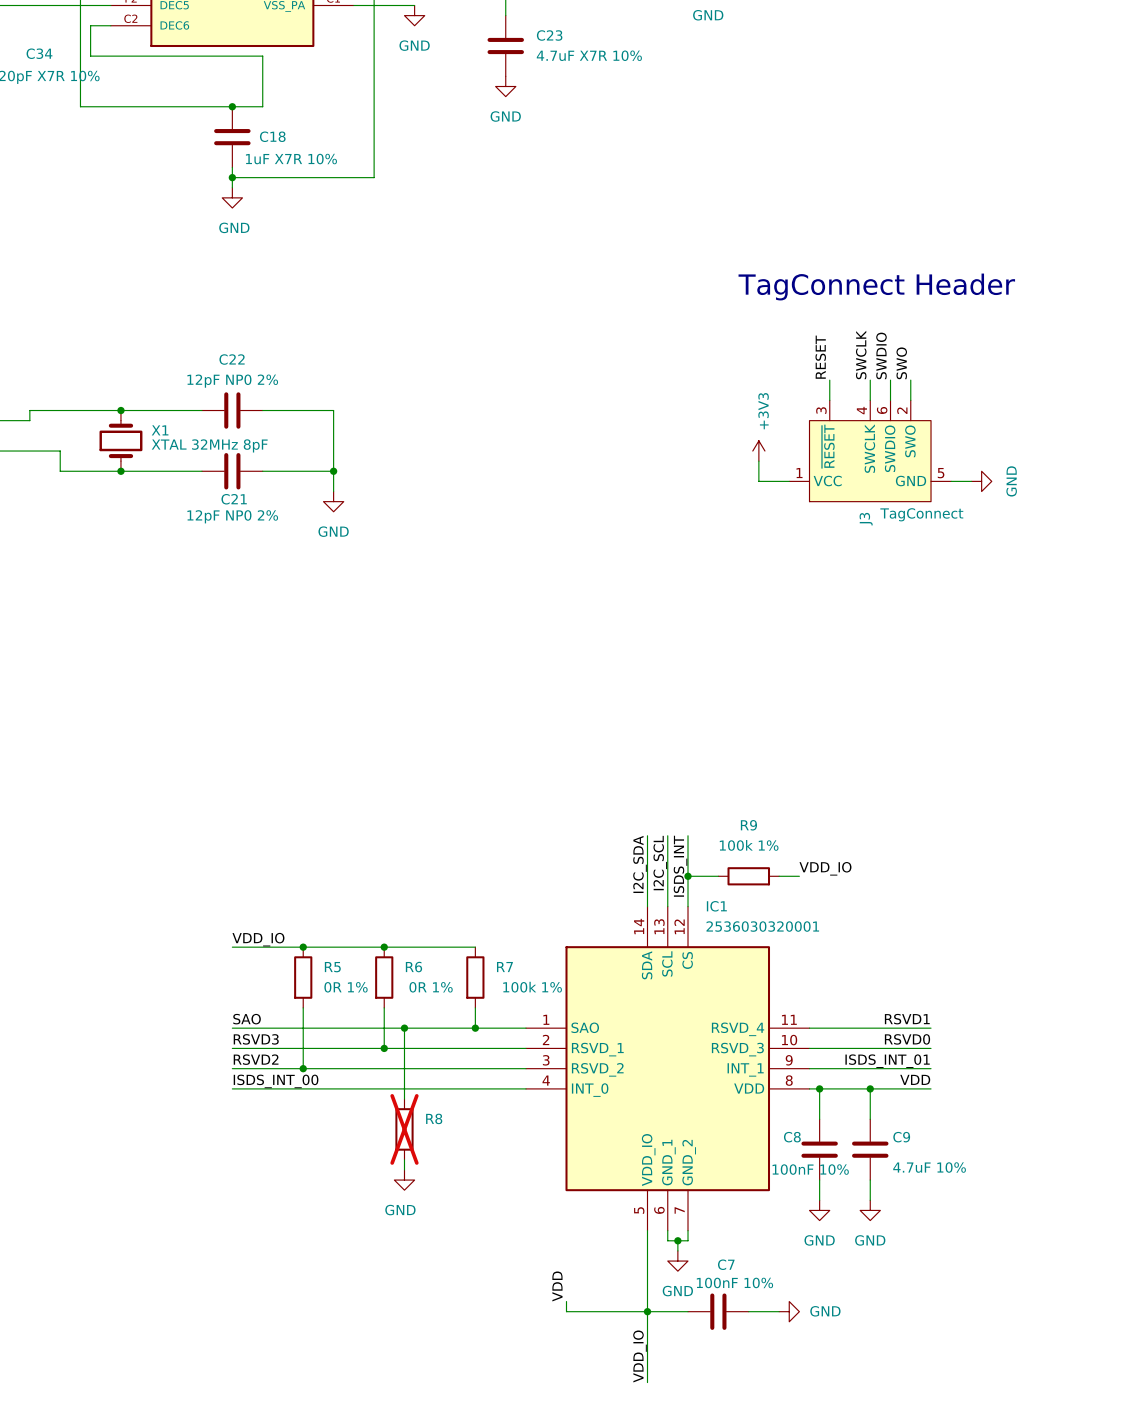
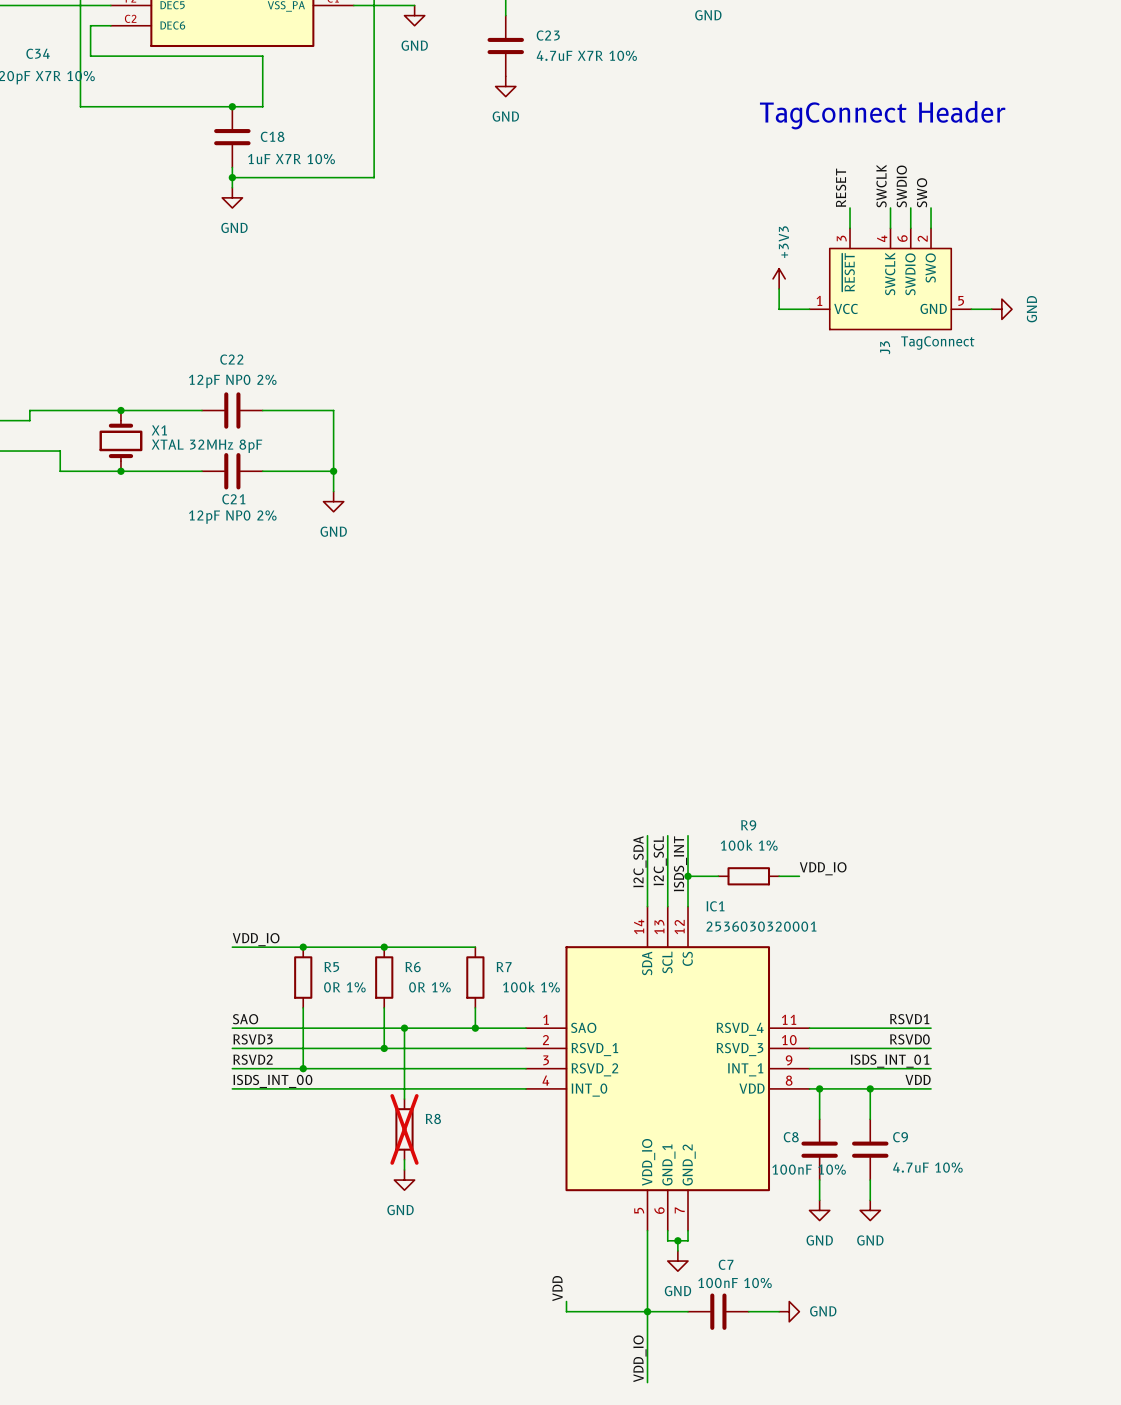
text position: TagConnect Header (876, 287) -> TagConnect Header (882, 115)
label position: SWCLK (861, 354) -> SWCLK (881, 186)
label position: SWDIO (881, 355) -> SWDIO (901, 186)
label position: RESET (820, 357) -> RESET (841, 187)
label position: SWO (901, 363) -> SWO (922, 192)
wire: (829, 380) (829, 400) -> (850, 208) (850, 228)
wire: (870, 380) (870, 400) -> (890, 208) (890, 228)
wire: (890, 380) (890, 400) -> (910, 208) (910, 228)
wire: (910, 380) (910, 400) -> (931, 208) (931, 228)
power symbol position: +3V3 (758, 451) -> +3V3 (779, 278)
J3 position: (870, 451) -> (890, 278)
wire: (758, 461) (758, 481) (789, 481) -> (779, 289) (779, 309) (809, 309)
wire: (951, 481) (971, 481) -> (971, 309) (991, 309)
power symbol position: GND (981, 481) -> GND (1001, 309)

